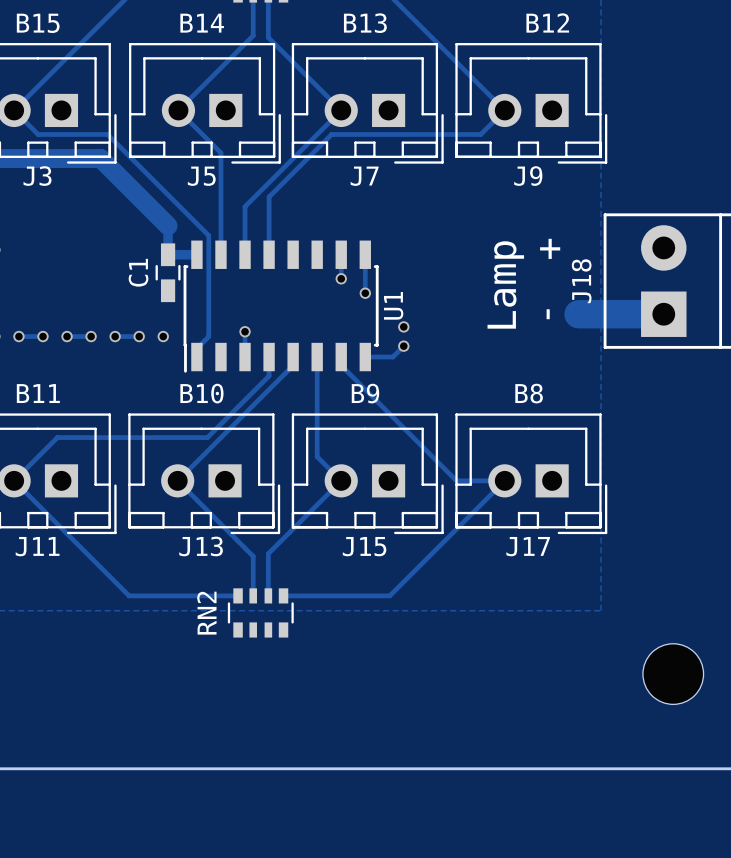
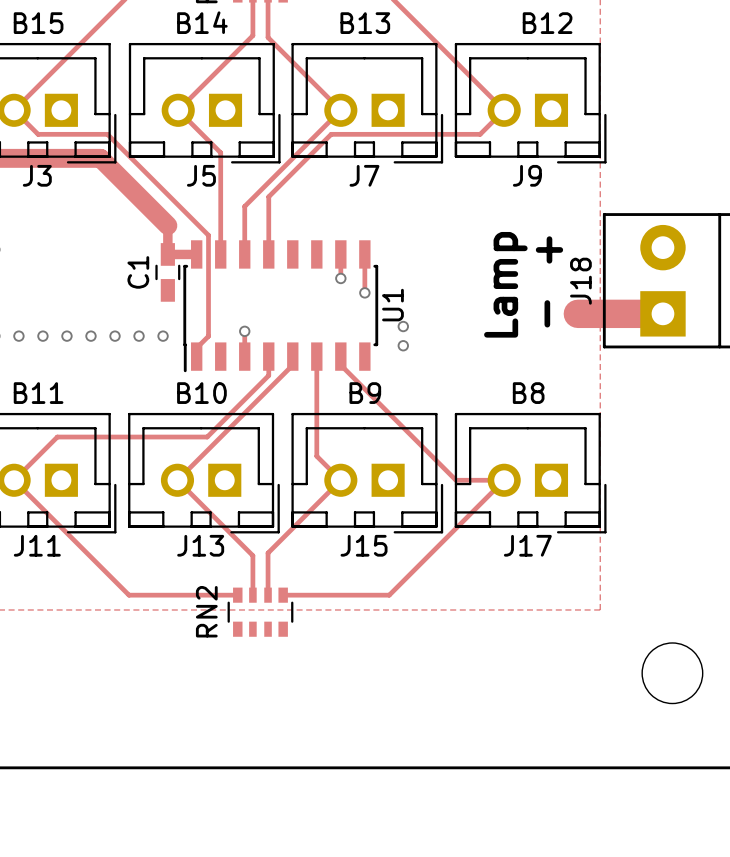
track: (18, 336) (42, 336) -> none
track: (67, 336) (91, 336) -> none
track: (115, 336) (139, 336) -> none
track: (403, 346) (392, 357) (365, 357) -> none

